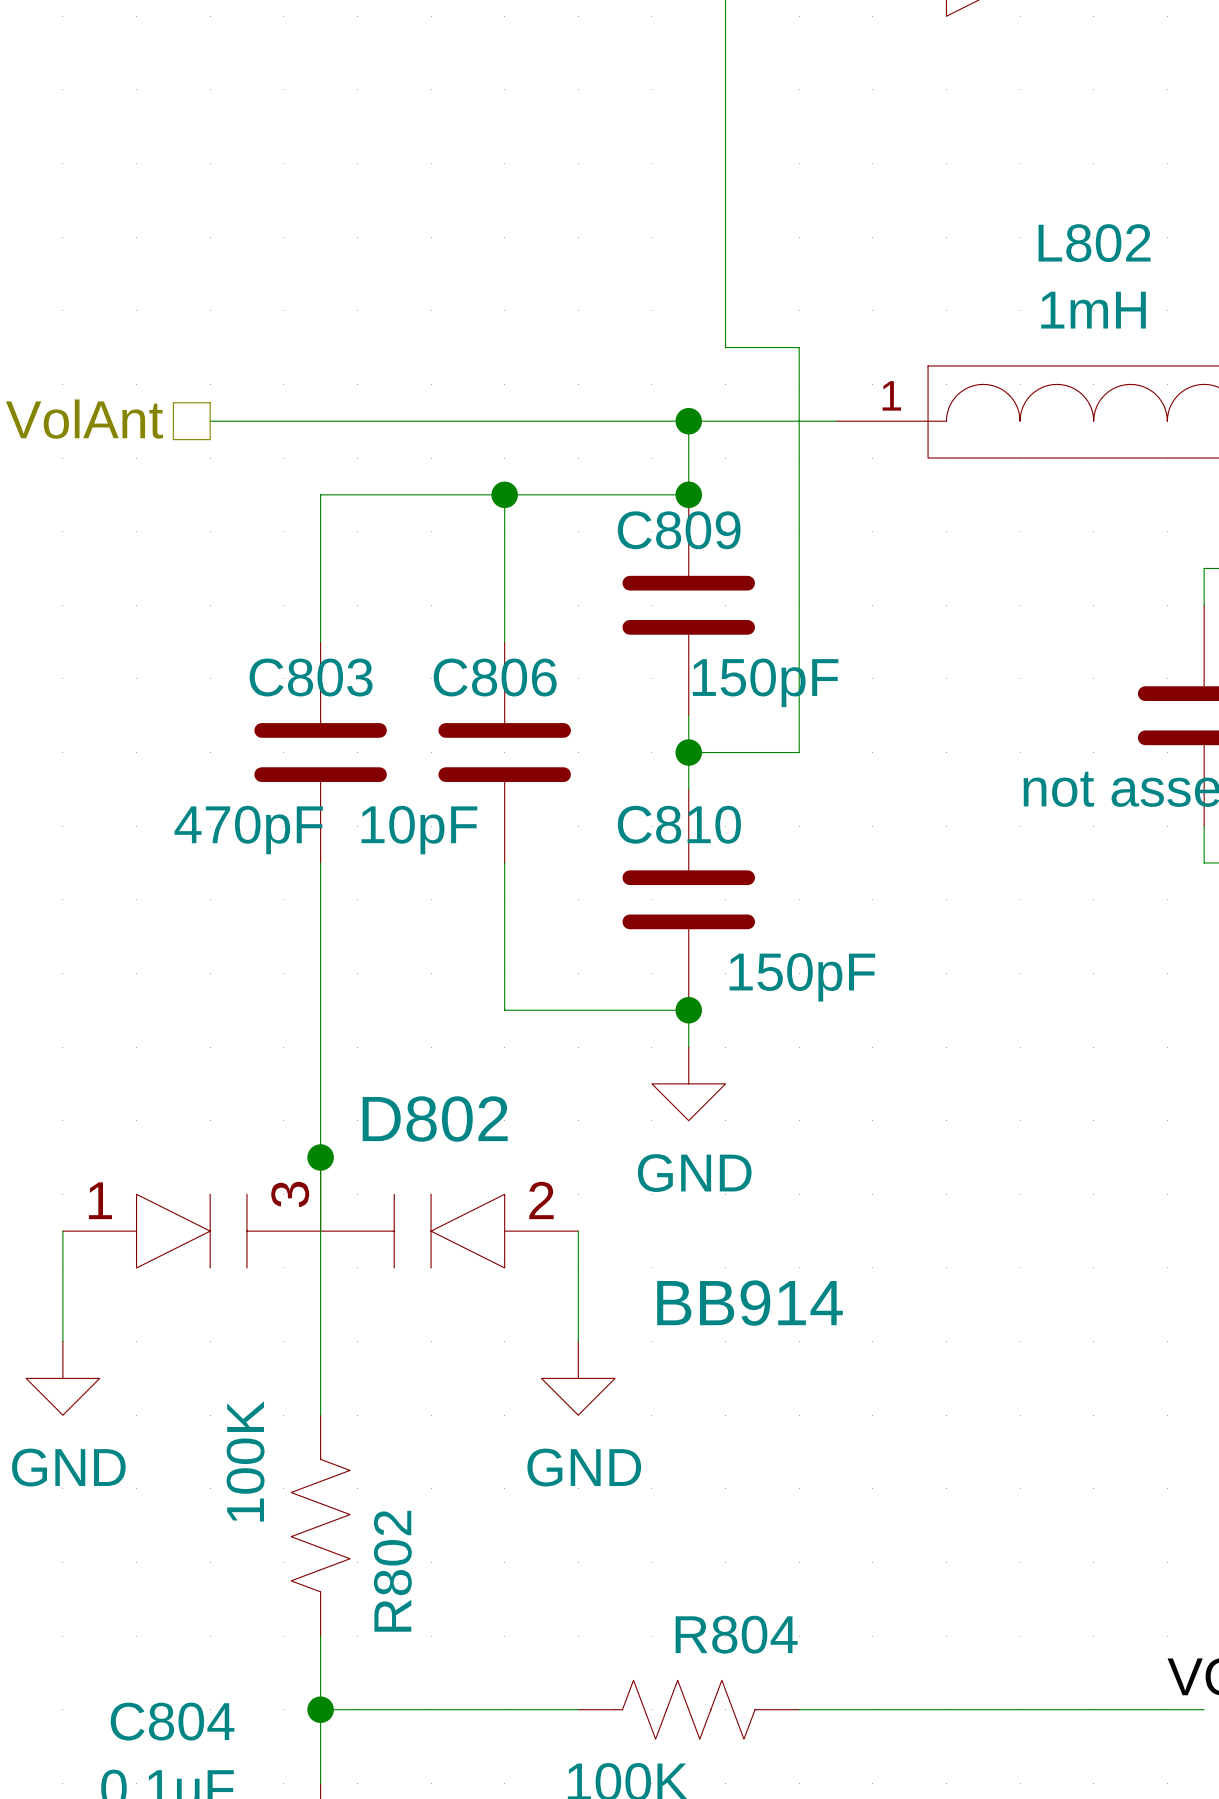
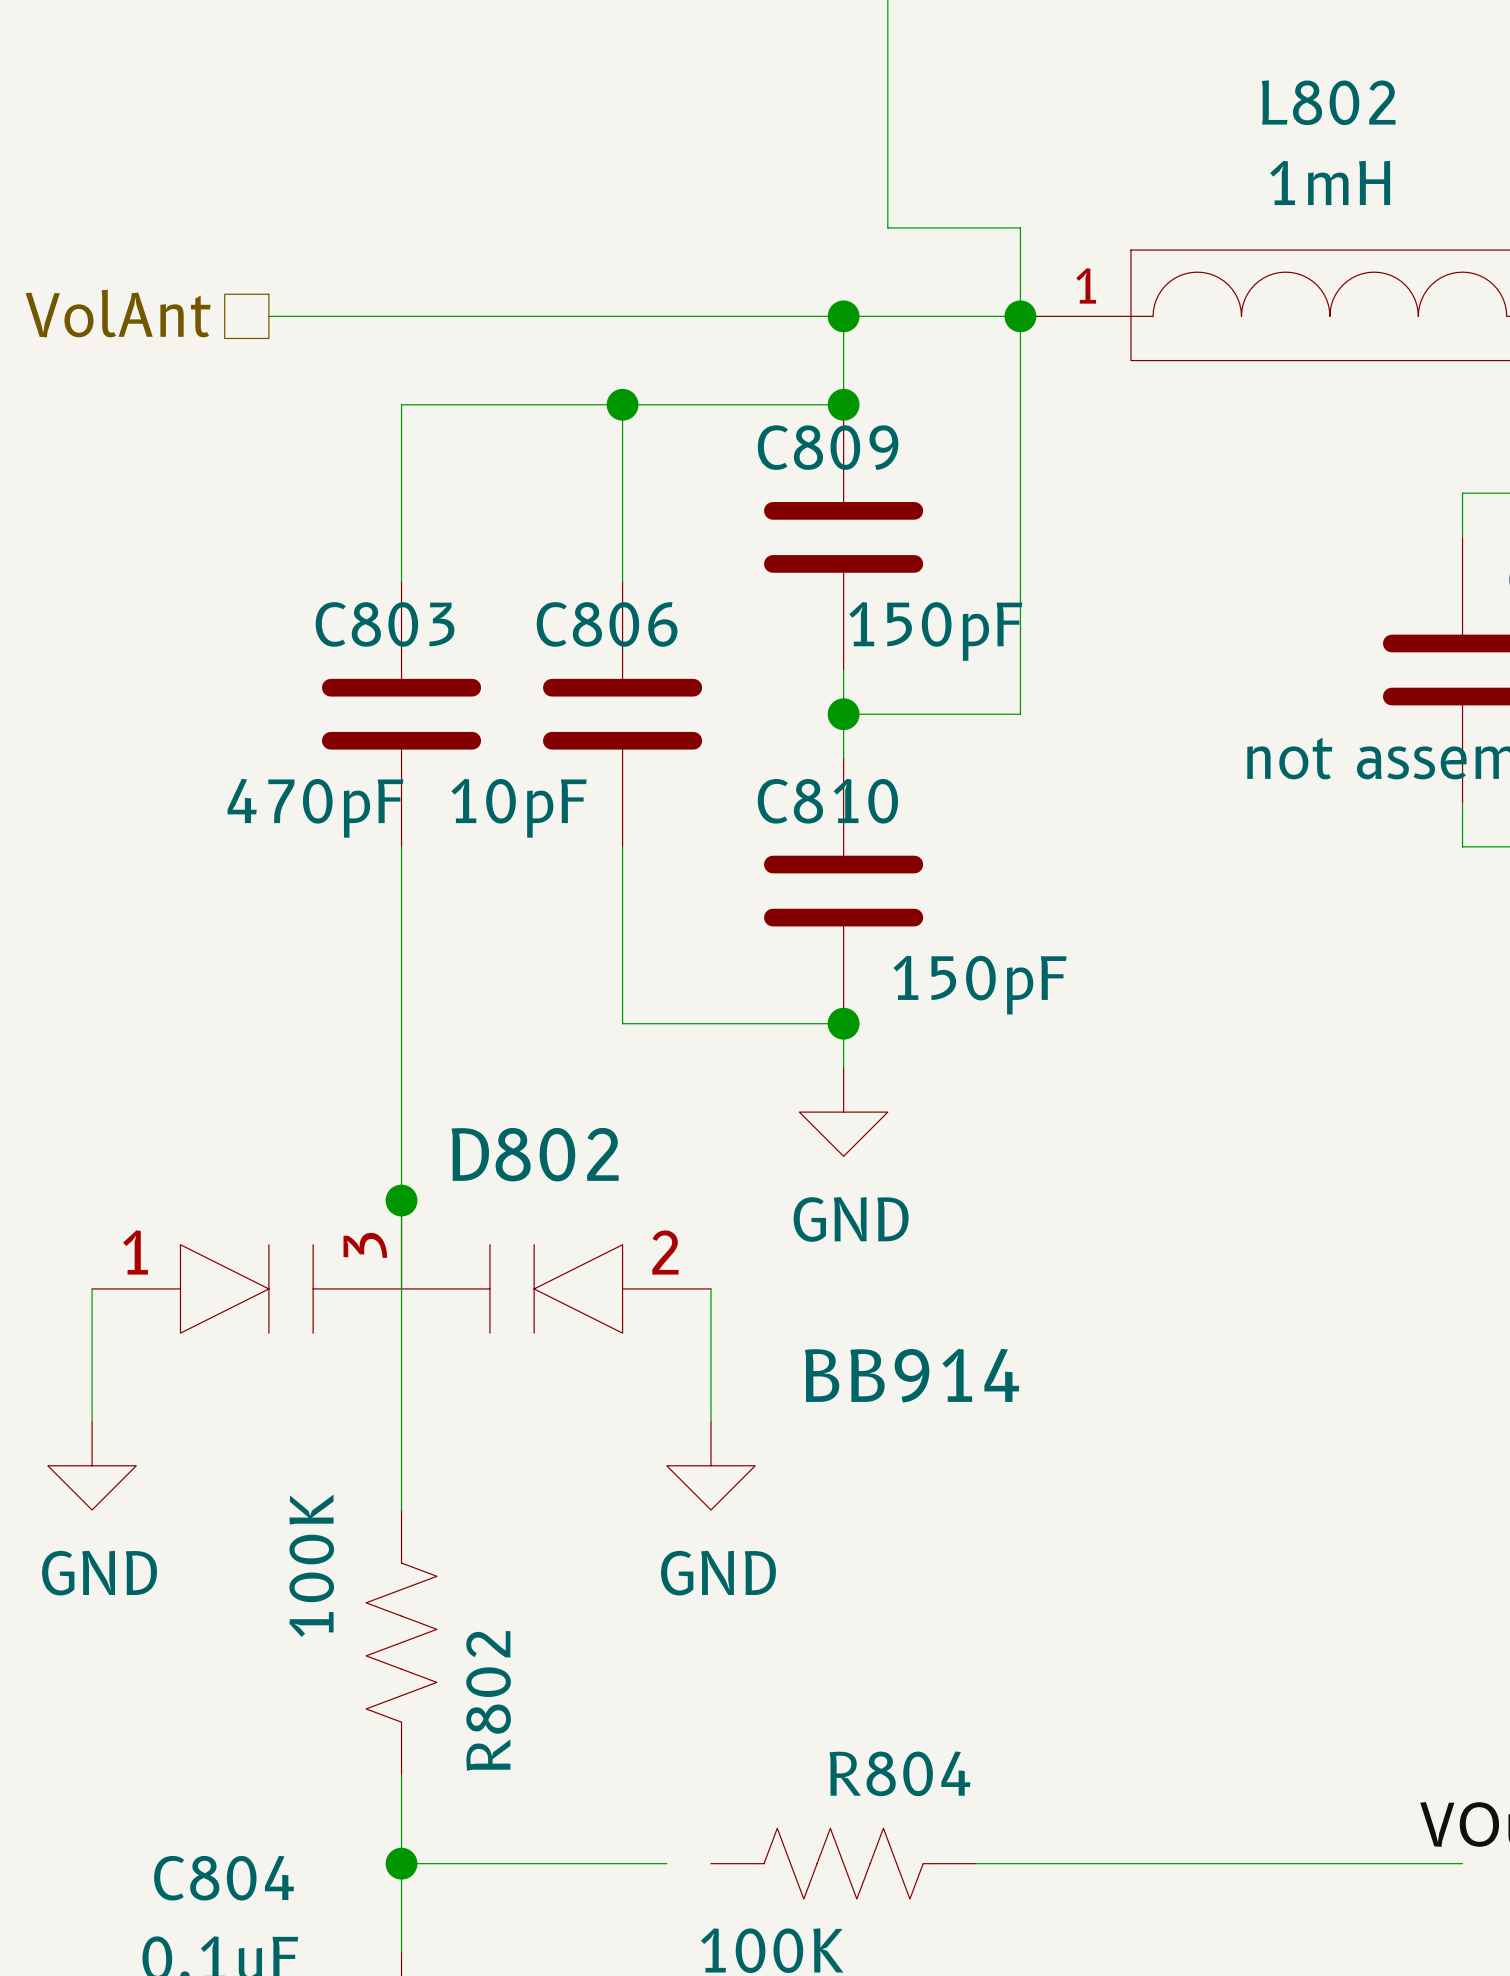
wire: (799, 347) (799, 752) -> (976, 227) (1020, 227) (1020, 714) (976, 714)
junction: none -> (1020, 316)
wire: (541, 1709) (578, 1709) -> none

